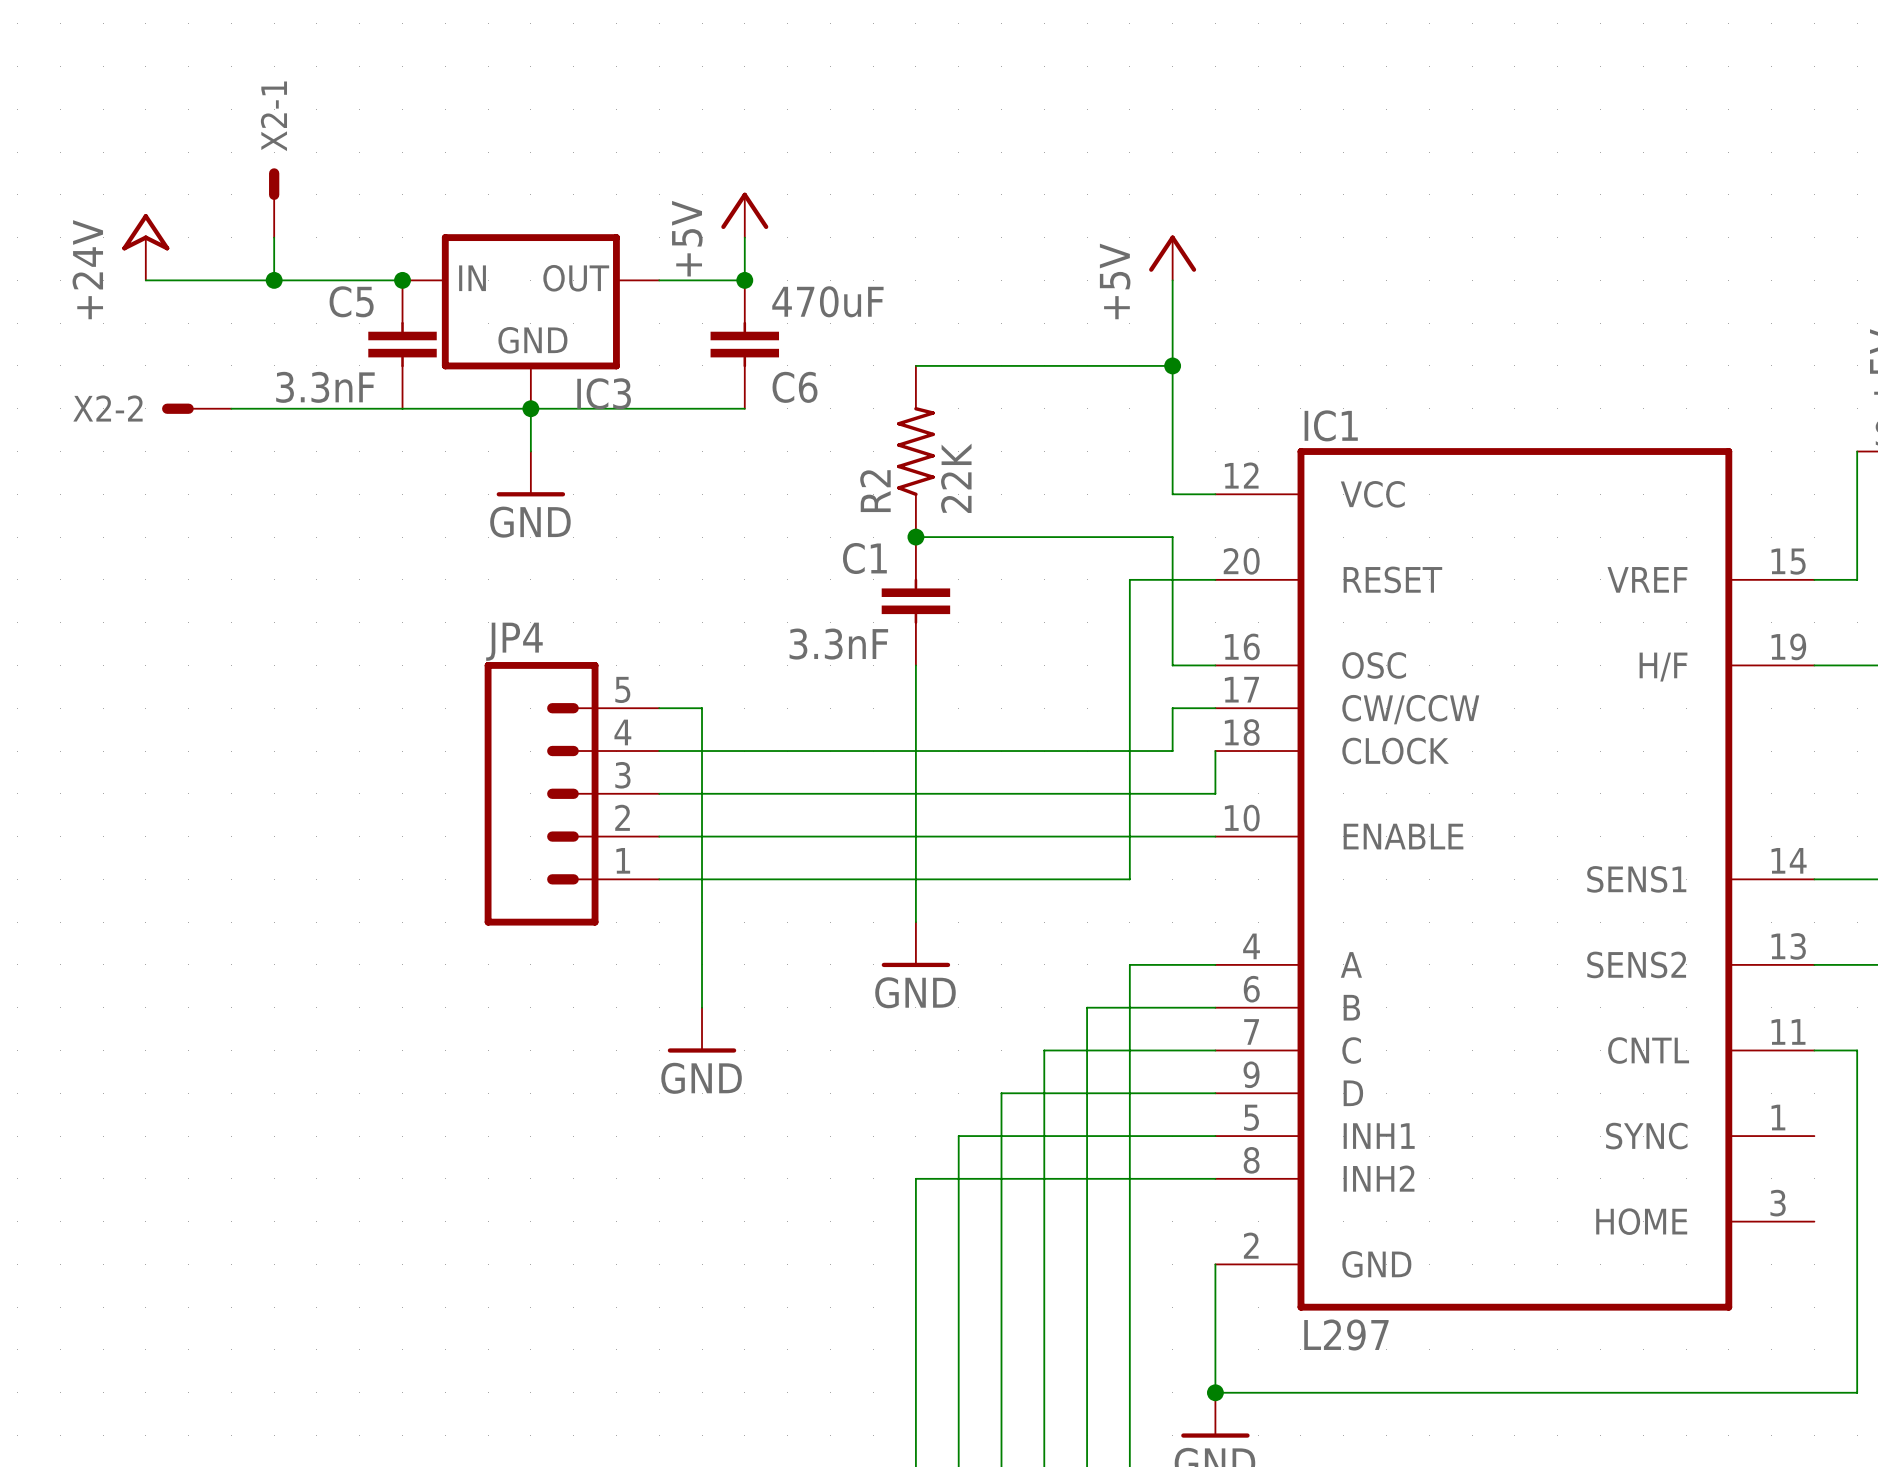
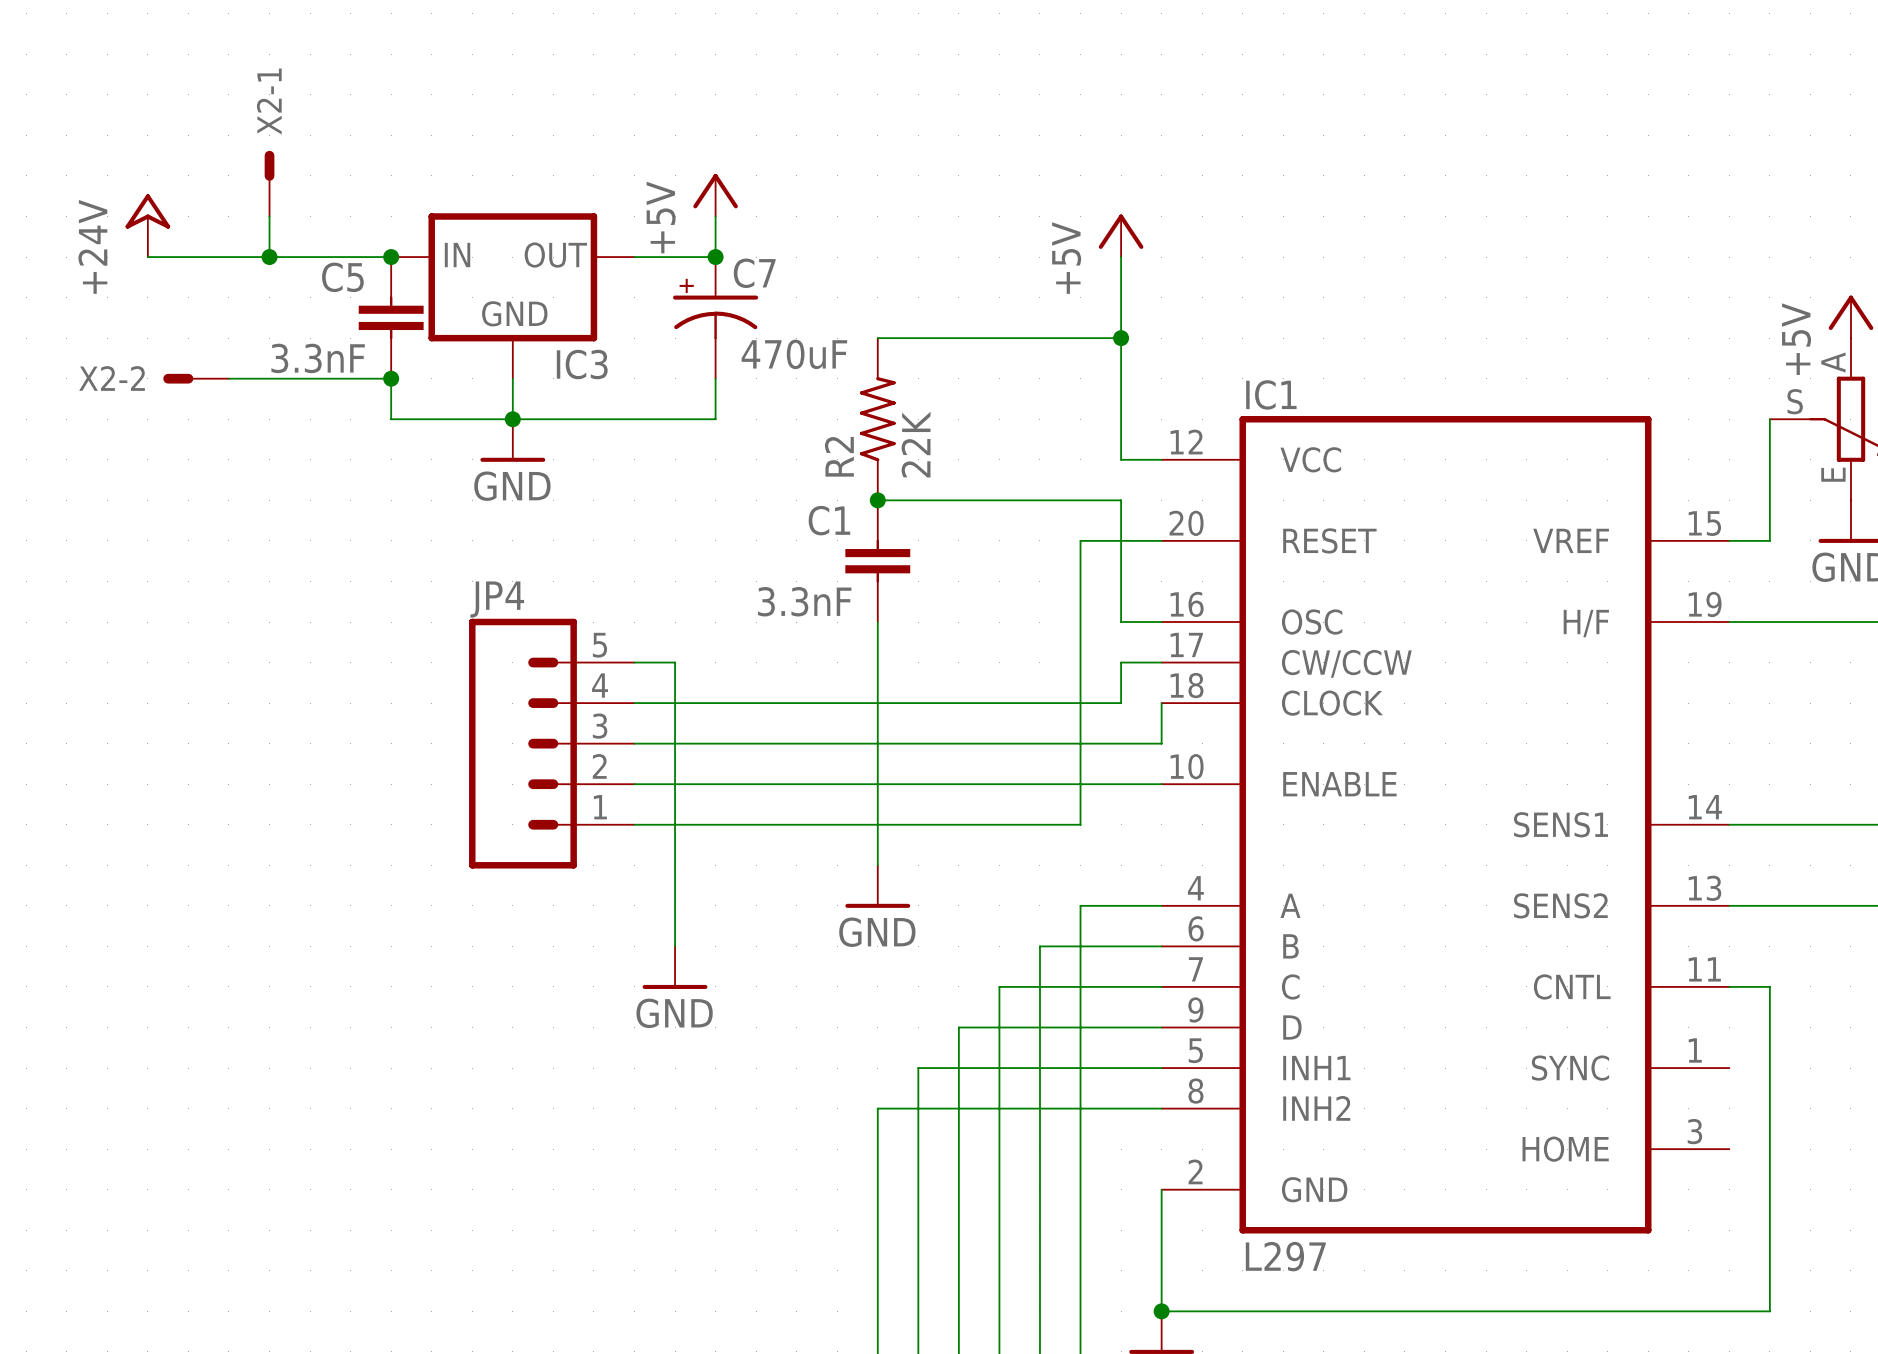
C6: 470uF (744, 344) -> none
C7: none -> 470uF (715, 317)
wire: (402, 408) (744, 408) -> (391, 378) (391, 419) (715, 419) (715, 378)
junction: none -> (391, 378)
junction position: (530, 408) -> (512, 419)

